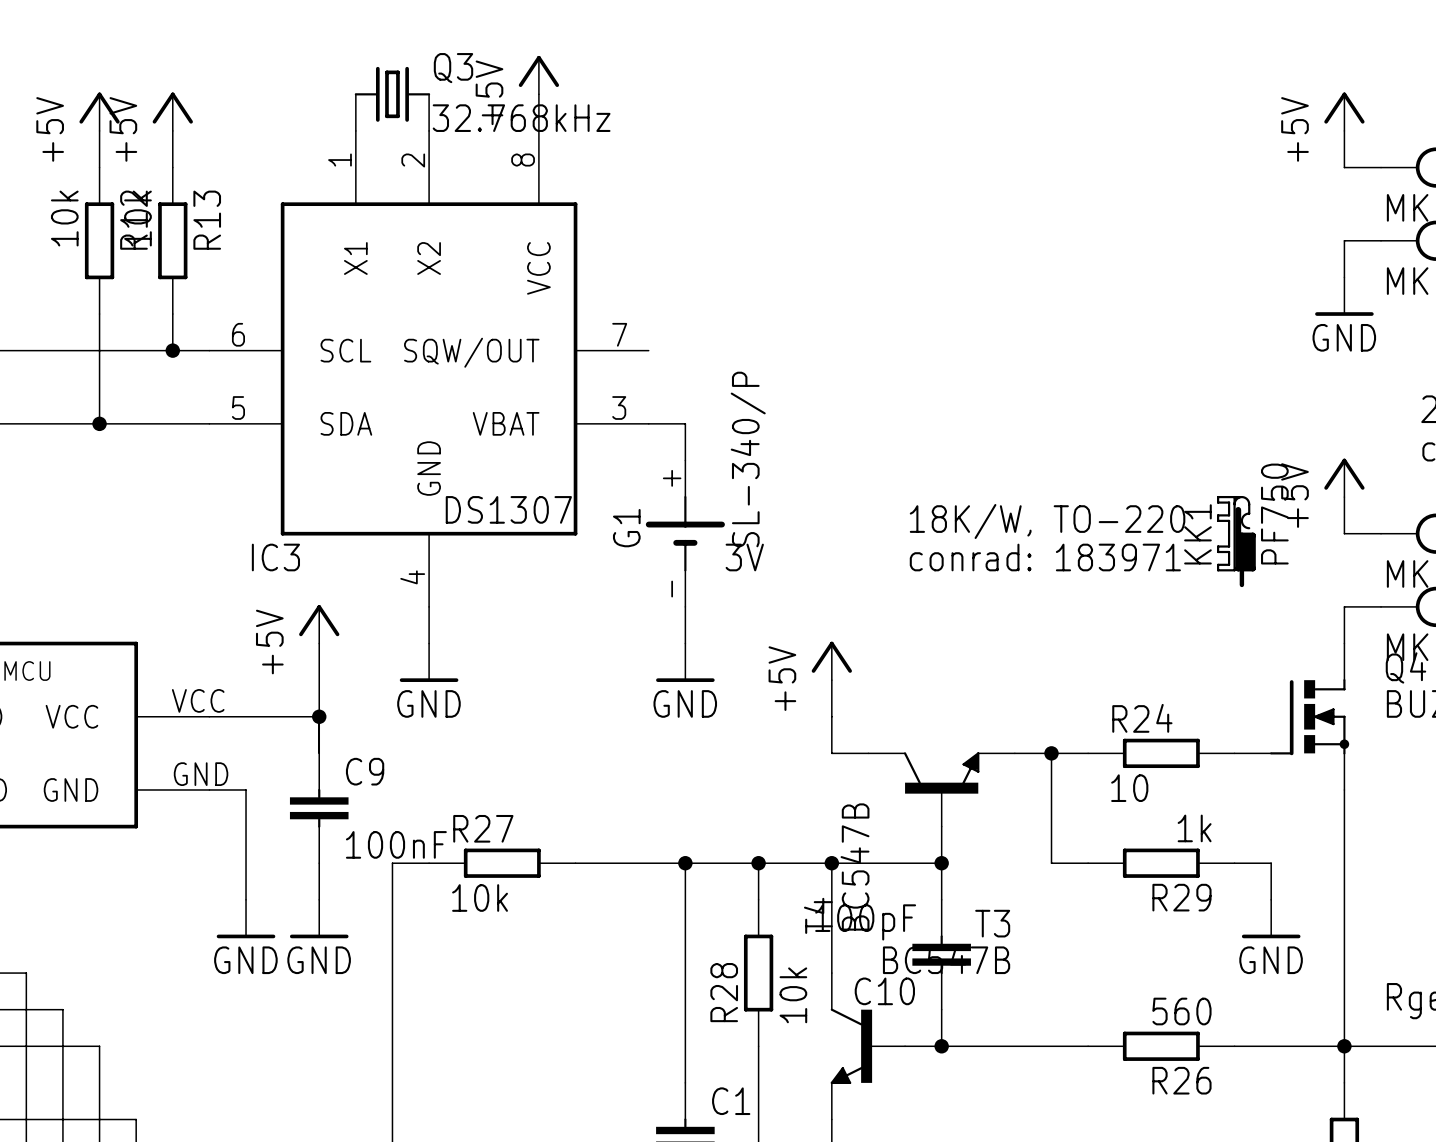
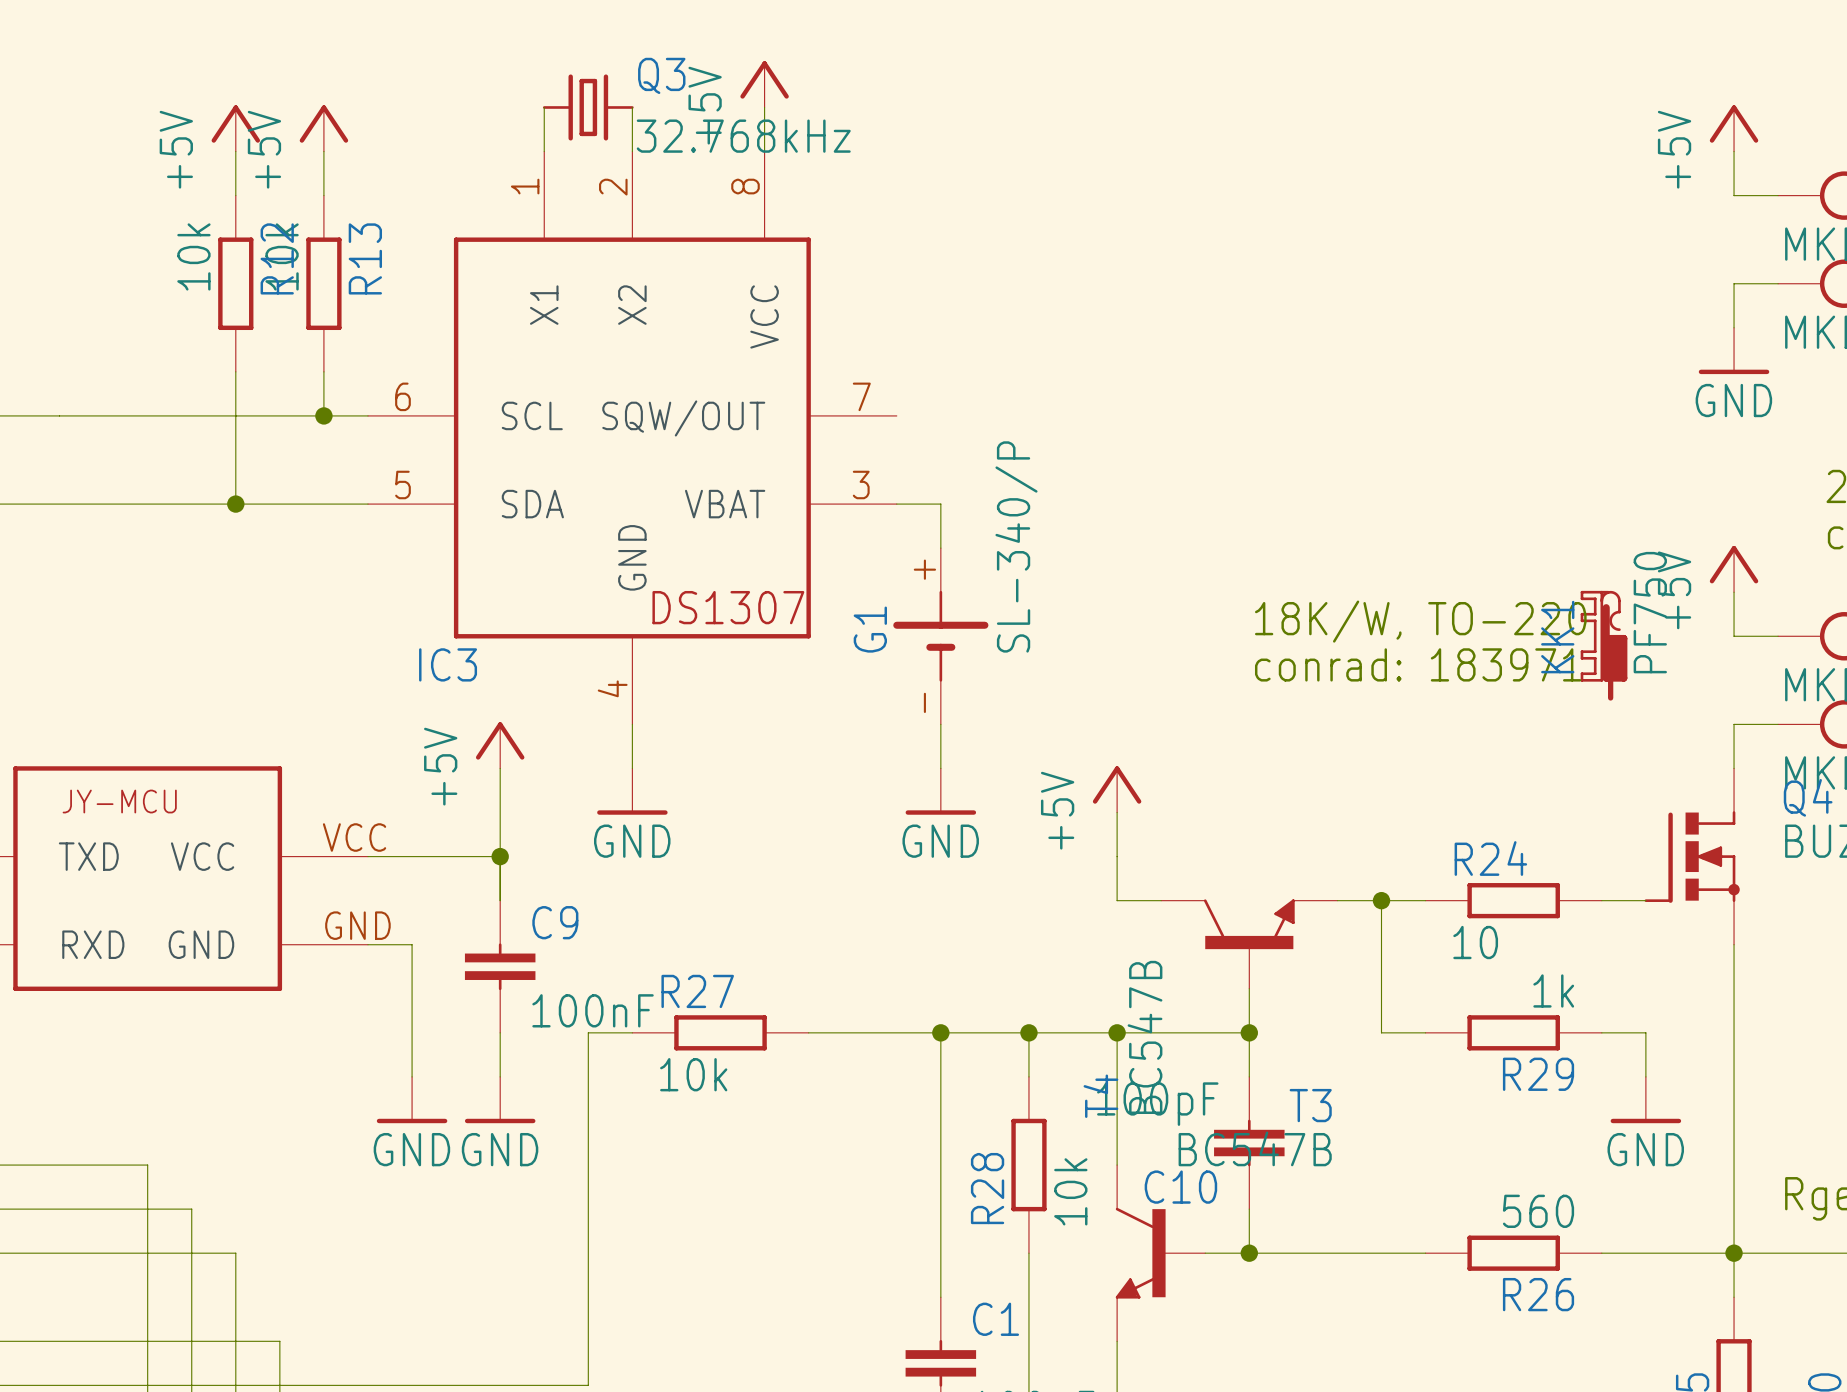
text position: 18K/W, TO-220 (1047, 521) -> 18K/W, TO-220 (1420, 621)
text: 3V (744, 557) -> none
text position: conrad: 183971 (1045, 557) -> conrad: 183971 (1418, 664)

